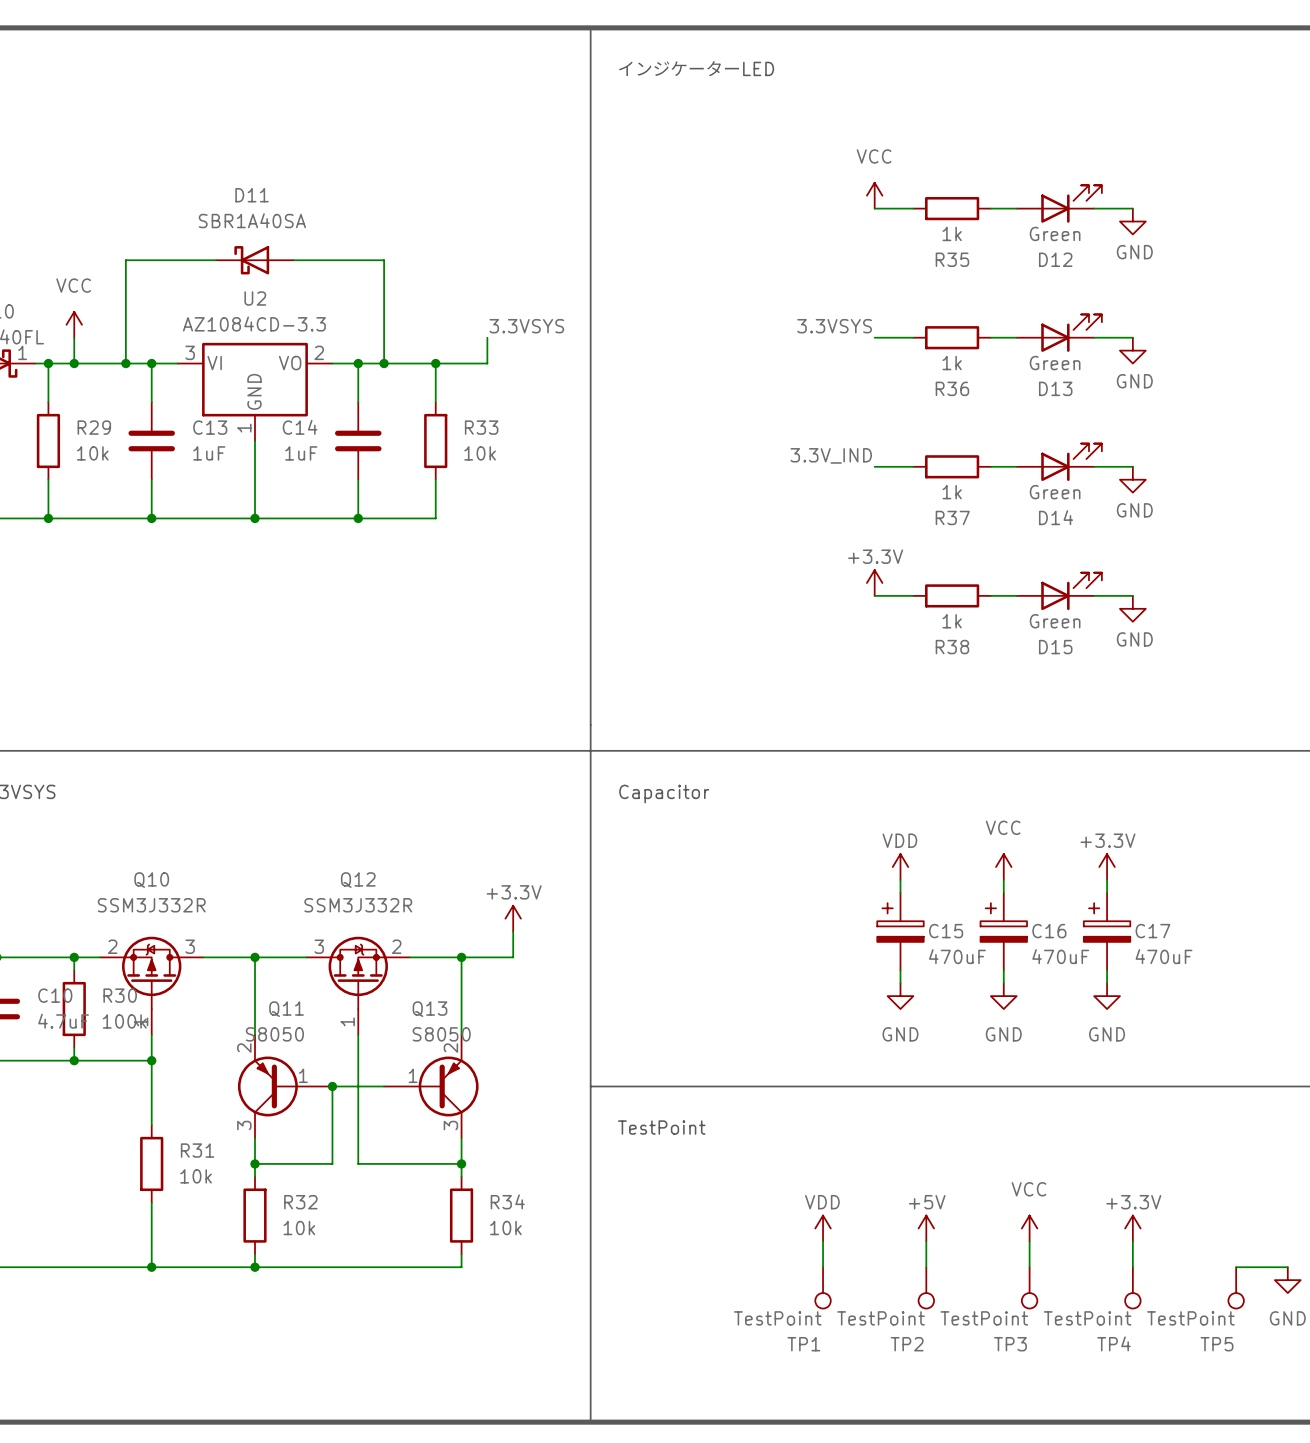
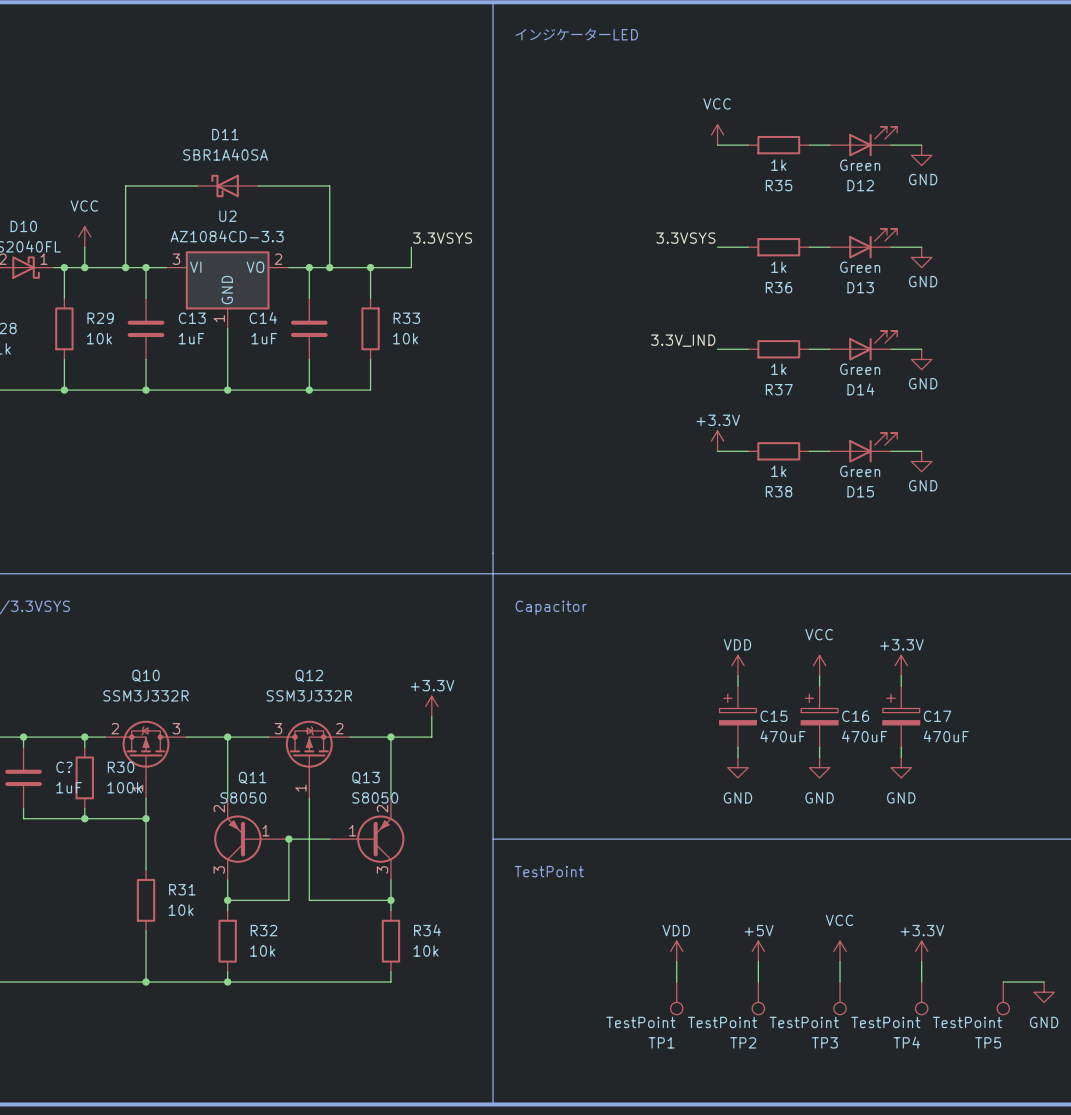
C10 name: C10 (55, 995) -> C? (64, 767)
C10 value: 4.7uF (63, 1021) -> 1uF (69, 787)

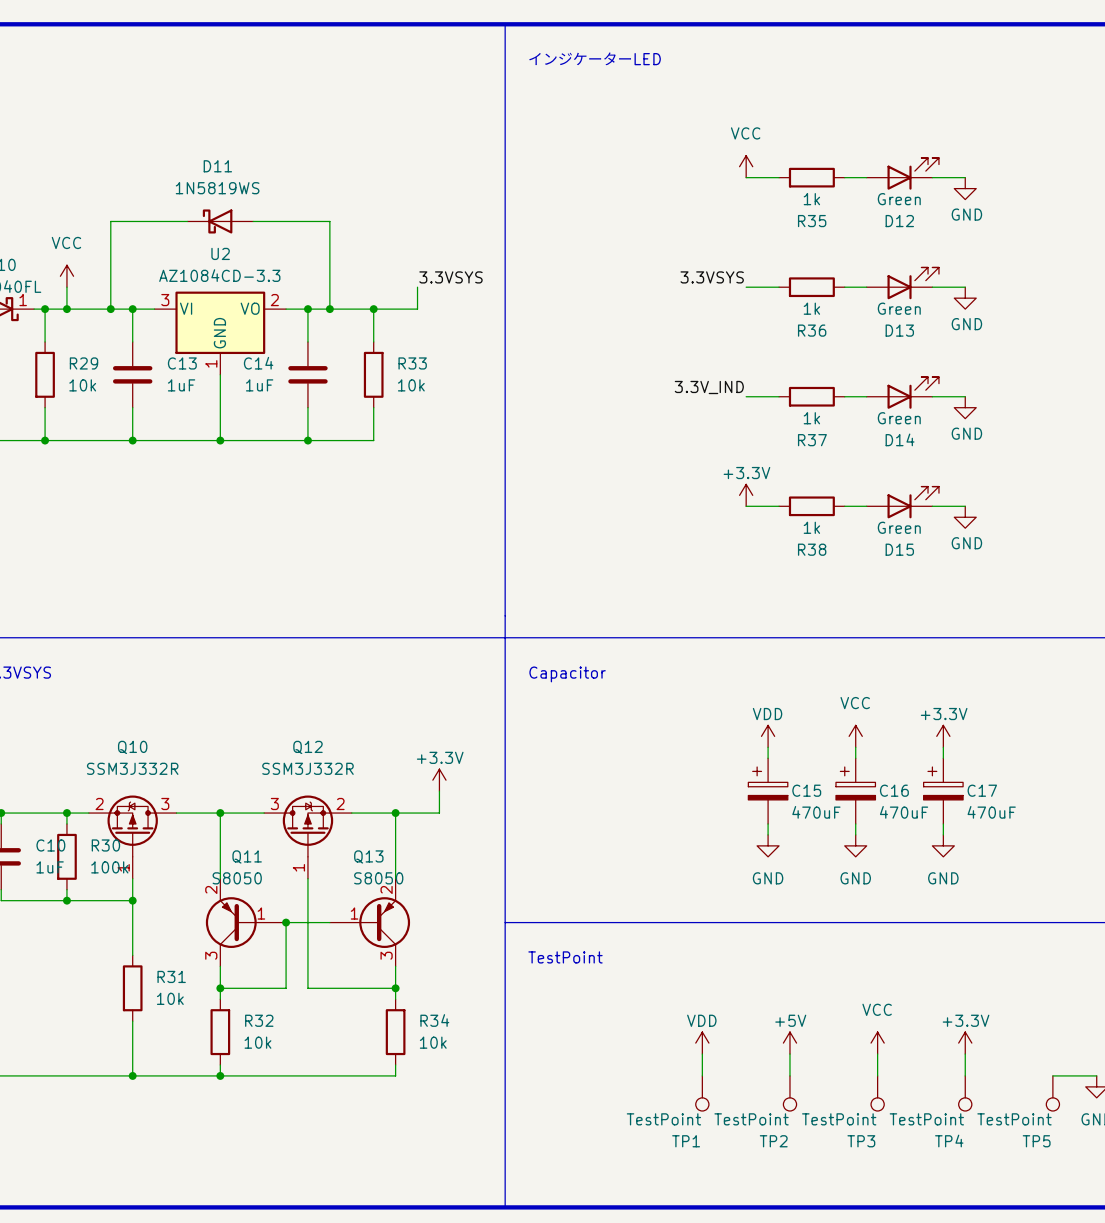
D11 value: SBR1A40SA (225, 154) -> 1N5819WS (217, 188)
C? name: C? (64, 767) -> C10 (50, 845)

